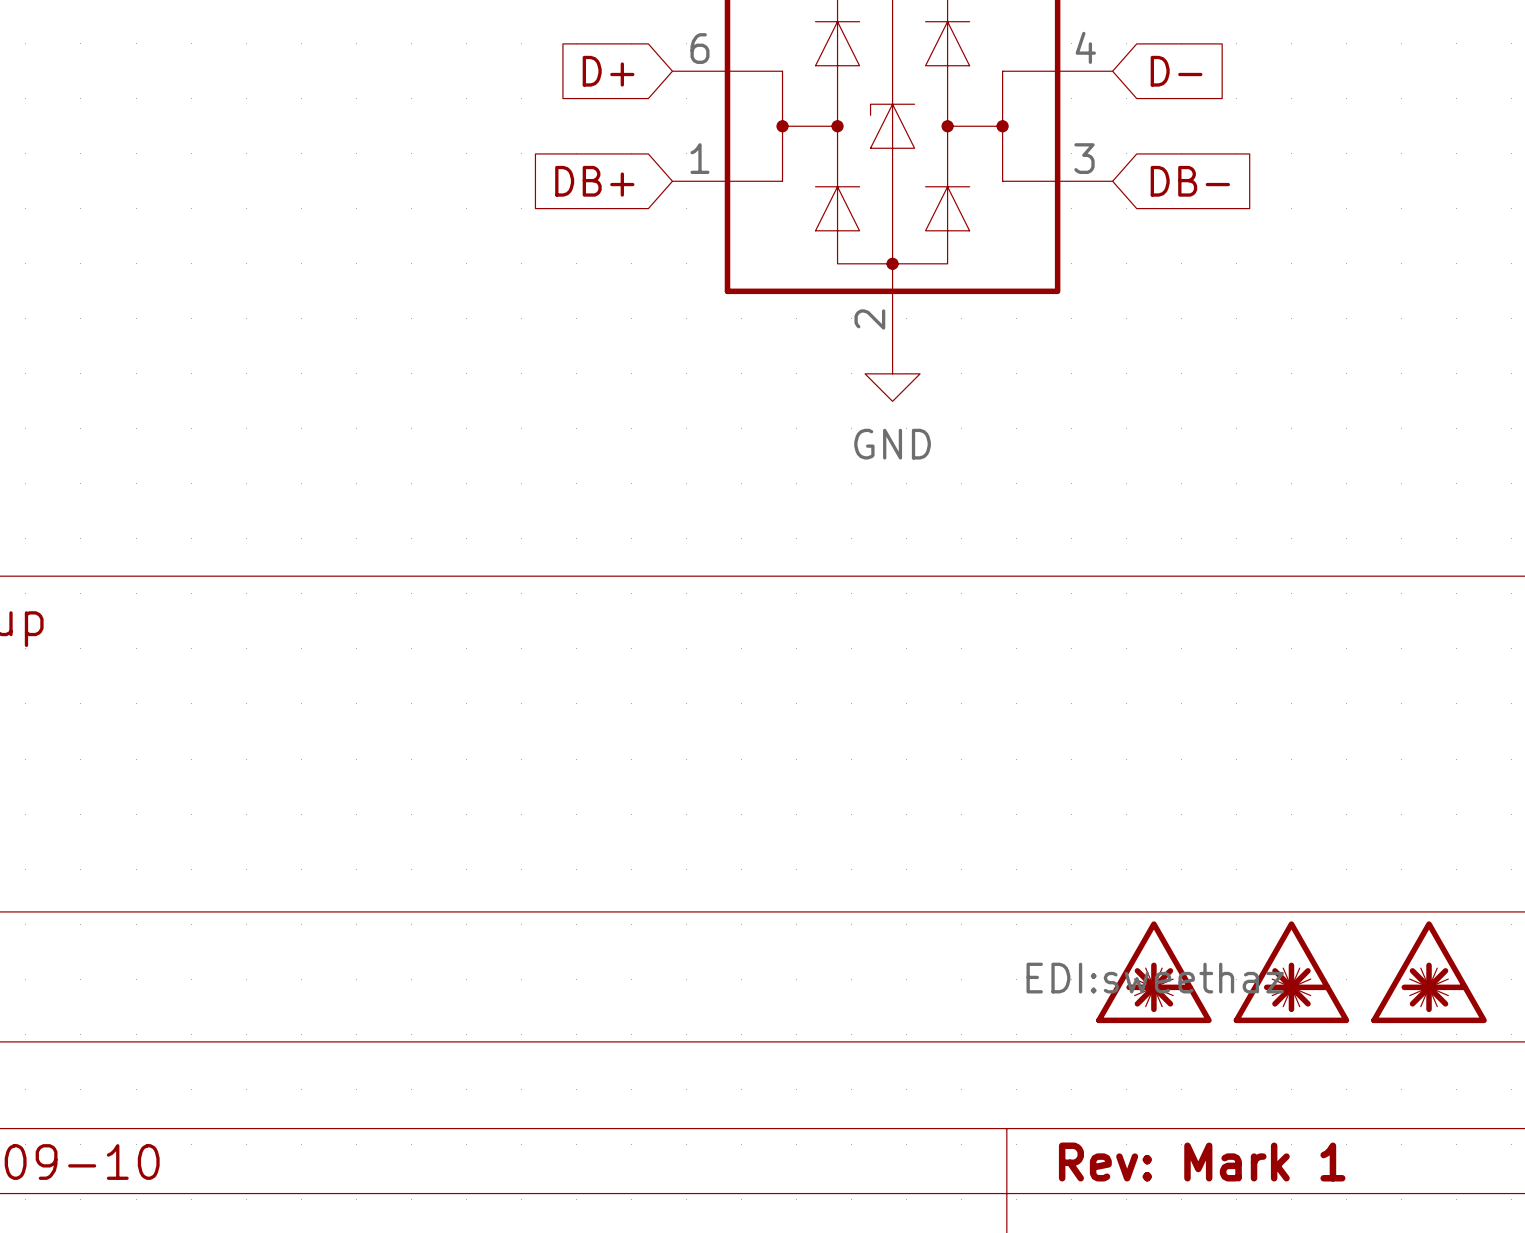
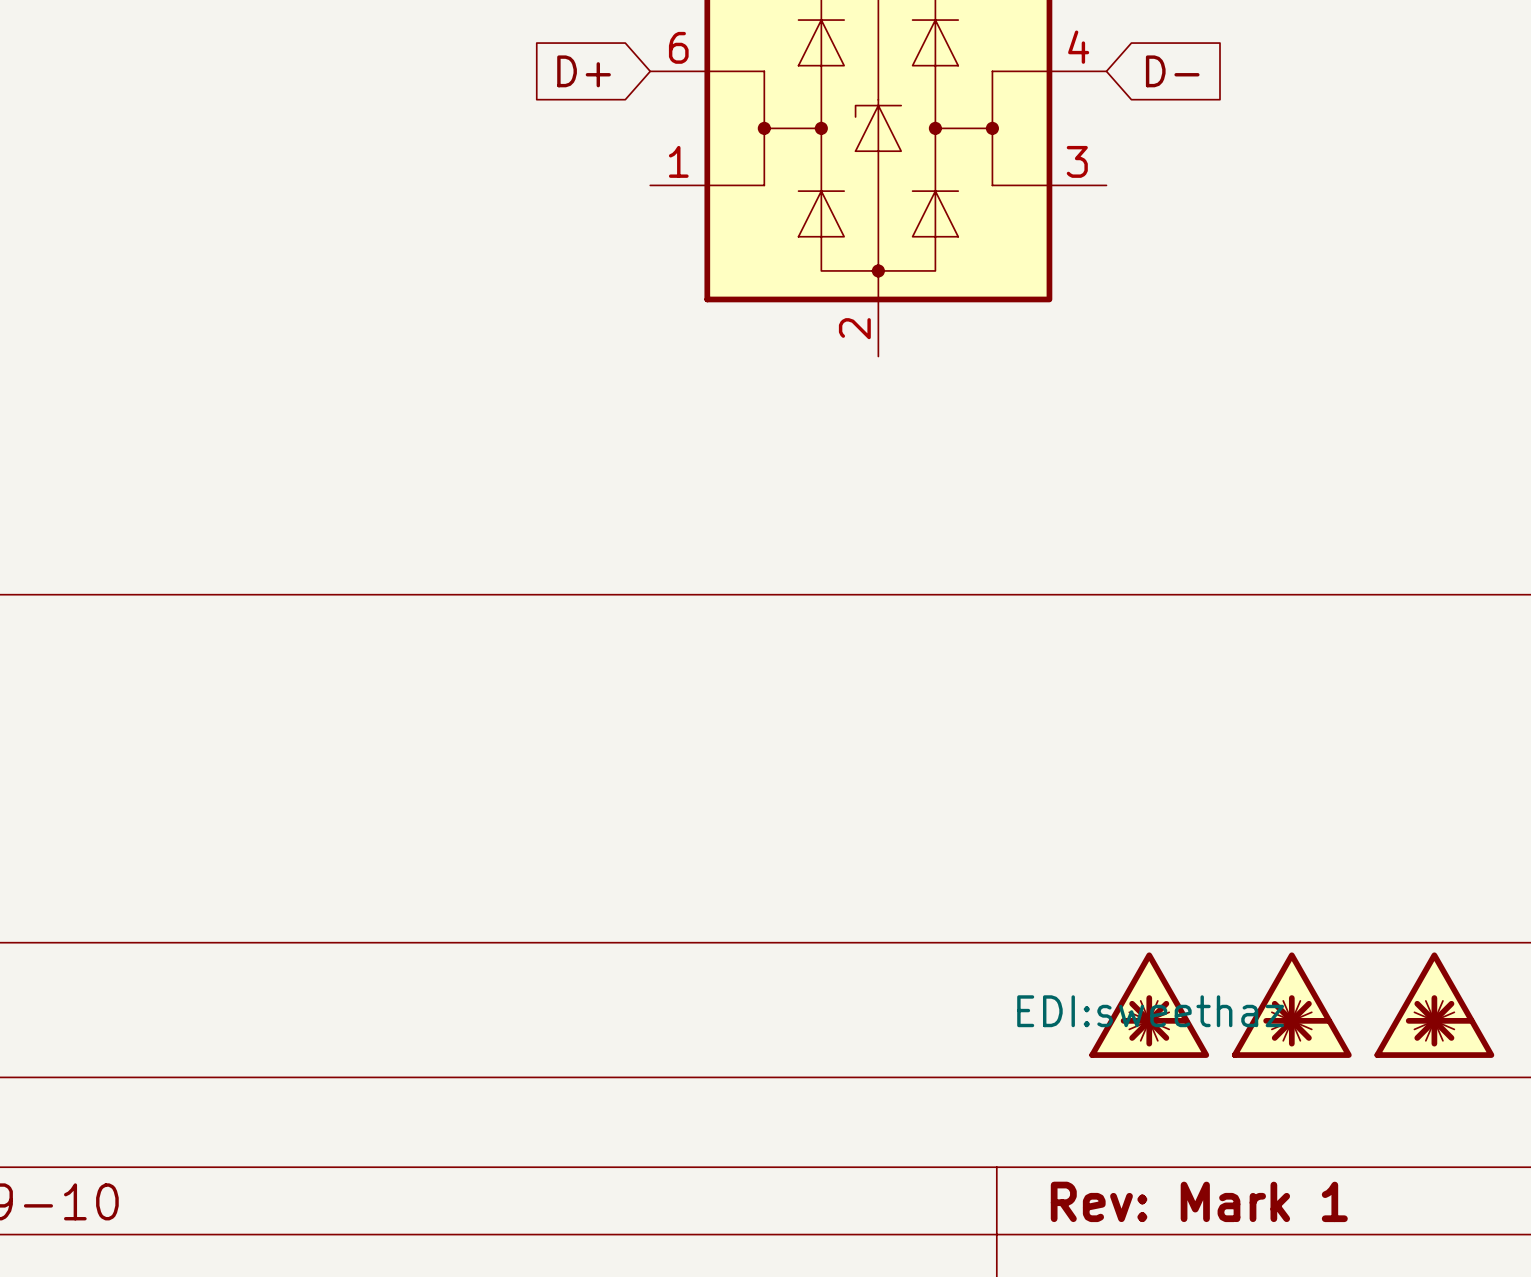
global label: DB+ (594, 181) -> none
global label: DB- (1190, 181) -> none
power symbol: GND (892, 373) -> none

